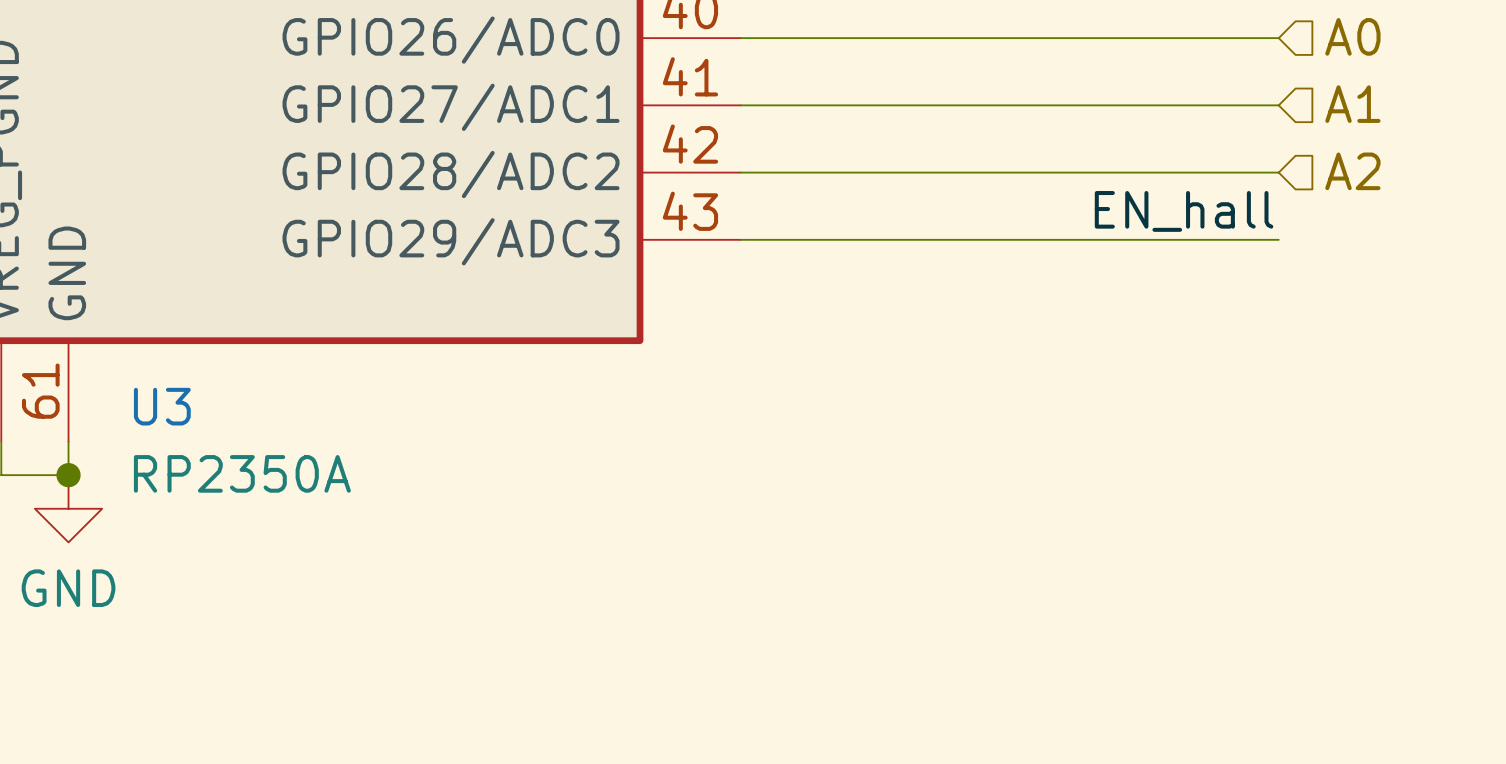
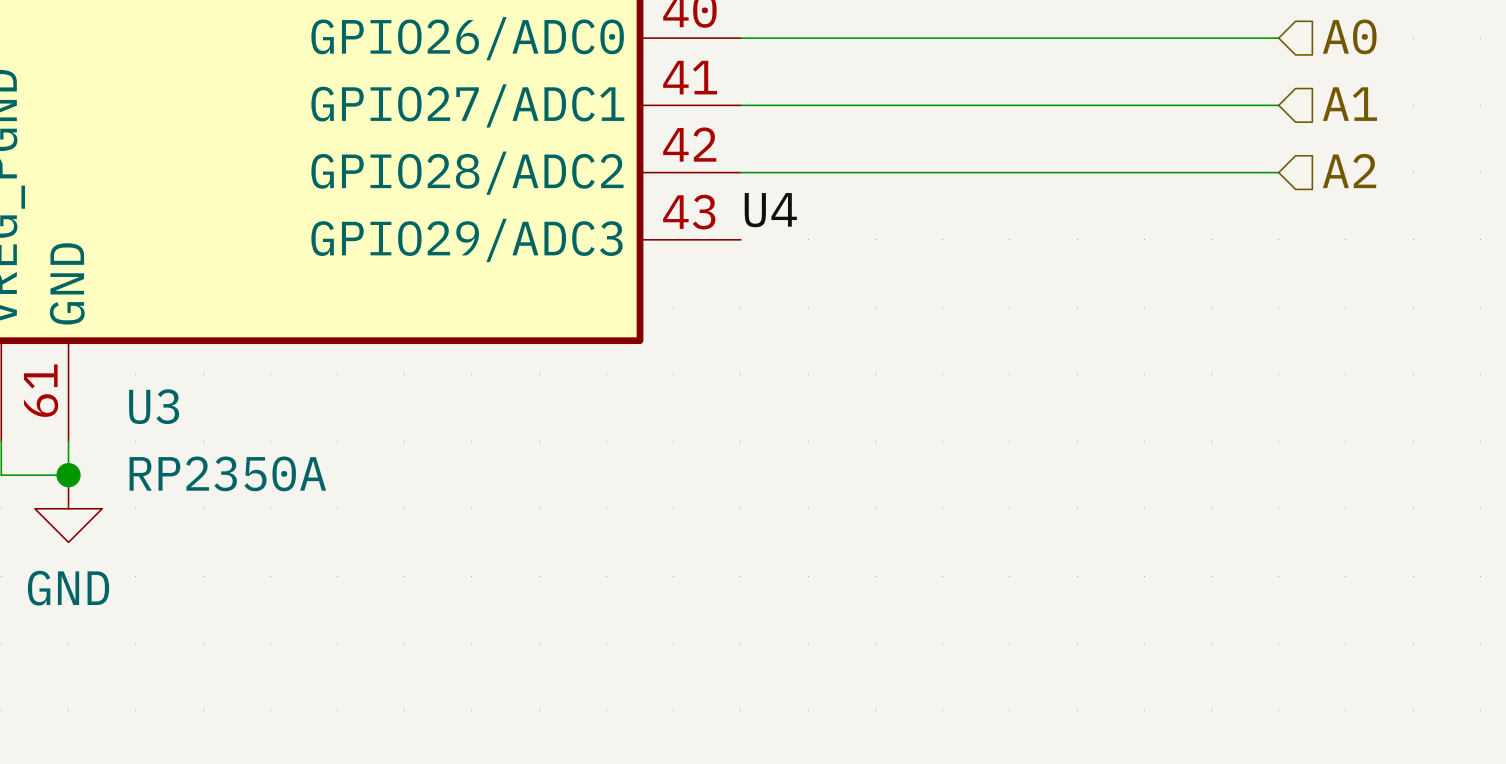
label: none -> U4 (770, 210)
label: EN_hall (1184, 211) -> none
wire: (740, 239) (1278, 239) -> none

